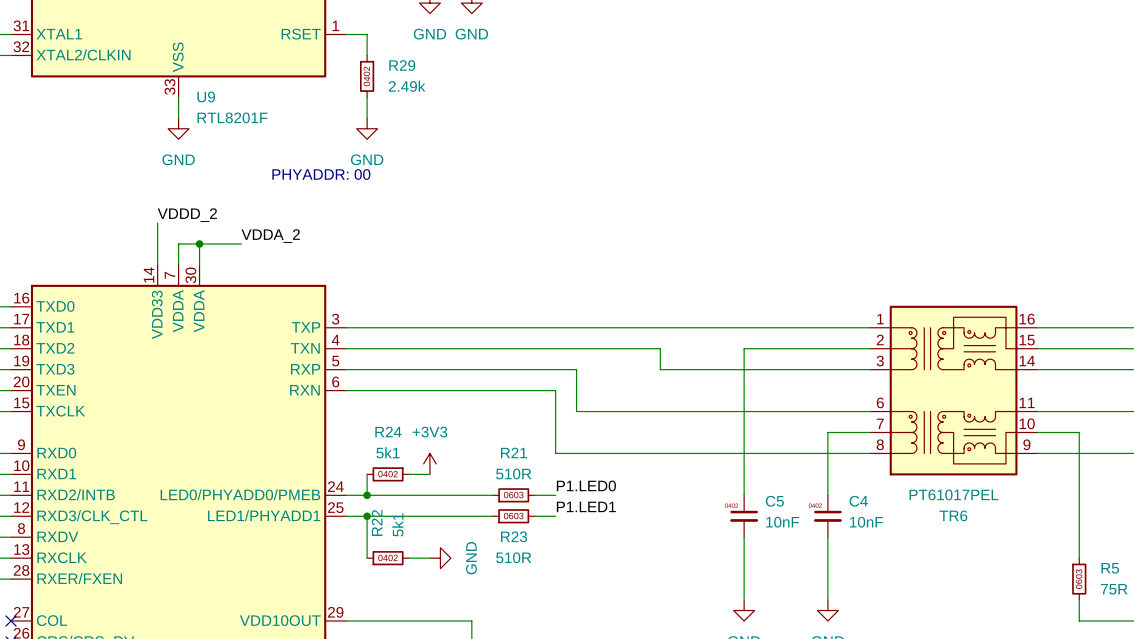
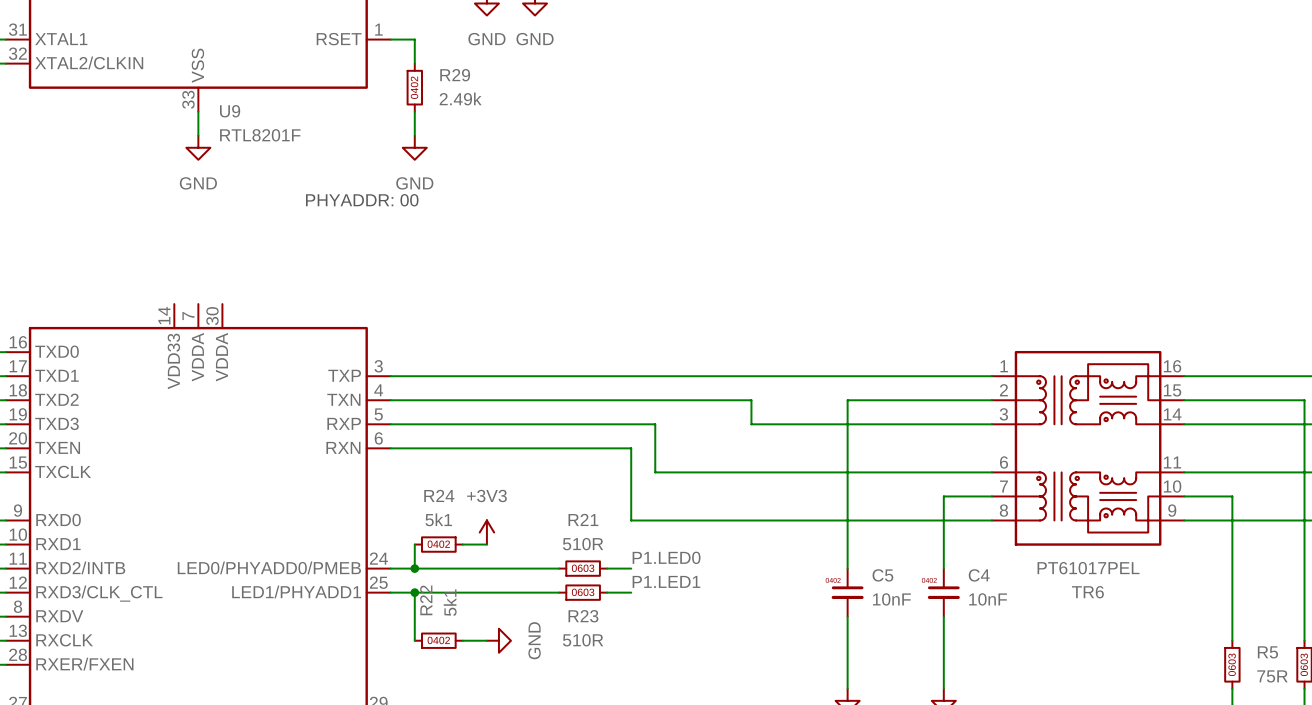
label: VDDD_2 (187, 215) -> none
wire: (157, 223) (157, 264) -> none
label: VDDA_2 (270, 236) -> none
wire: (199, 243) (199, 264) -> none
junction: (199, 243) -> none
wire: (241, 243) (178, 243) (178, 264) -> none

